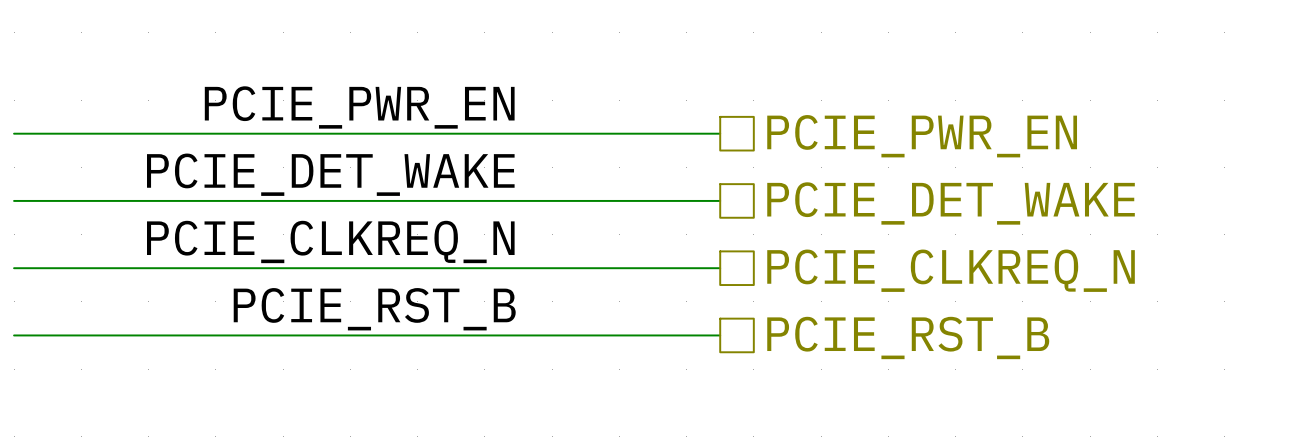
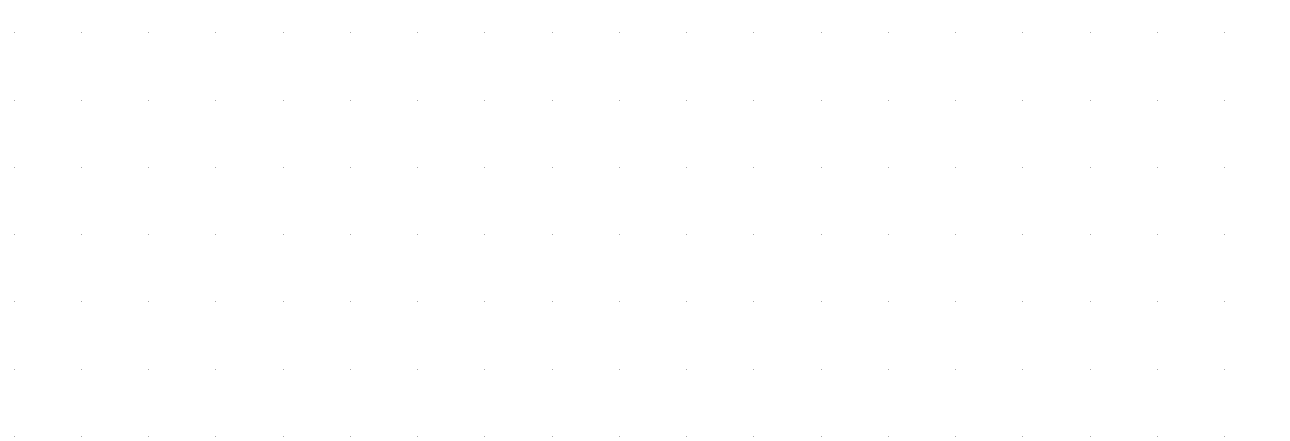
label: PCIE_PWR_EN (359, 107) -> none
wire: (14, 133) (720, 133) -> none
hierarchical label: PCIE_PWR_EN (922, 136) -> none
label: PCIE_DET_WAKE (330, 174) -> none
wire: (14, 200) (720, 200) -> none
hierarchical label: PCIE_DET_WAKE (951, 203) -> none
label: PCIE_CLKREQ_N (330, 241) -> none
wire: (14, 268) (720, 268) -> none
hierarchical label: PCIE_CLKREQ_N (951, 270) -> none
label: PCIE_RST_B (374, 309) -> none
wire: (14, 335) (720, 335) -> none
hierarchical label: PCIE_RST_B (908, 337) -> none

